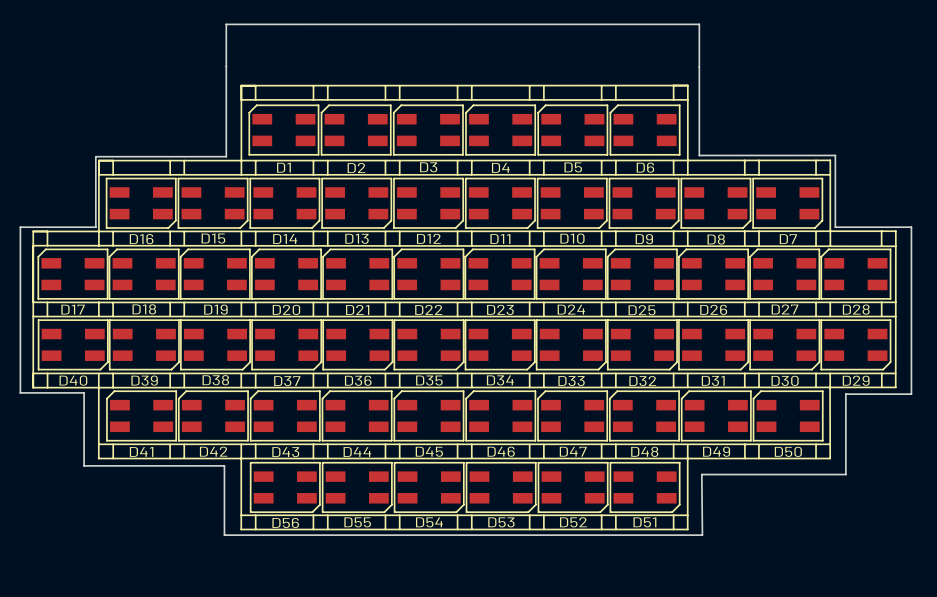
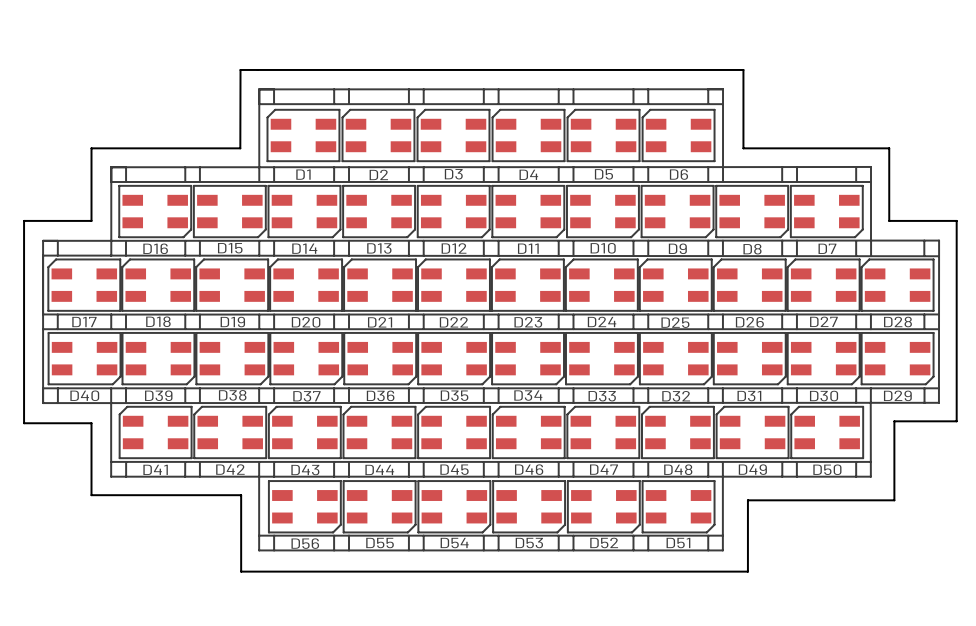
board edge: (226, 24) (699, 24) (699, 155) (835, 155) (835, 227) (911, 227) (911, 394) (845, 394) (845, 474) (701, 474) (702, 535) (224, 535) (224, 465) (84, 465) (84, 392) (20, 392) (20, 227) (95, 227) (95, 156) (226, 156) (226, 24) -> (240, 69) (240, 148) (91, 148) (91, 220) (24, 220) (24, 423) (91, 423) (91, 495) (241, 495) (241, 571) (747, 571) (747, 500) (894, 500) (894, 421) (956, 421) (956, 220) (889, 220) (889, 148) (743, 148) (743, 69) (240, 69)

